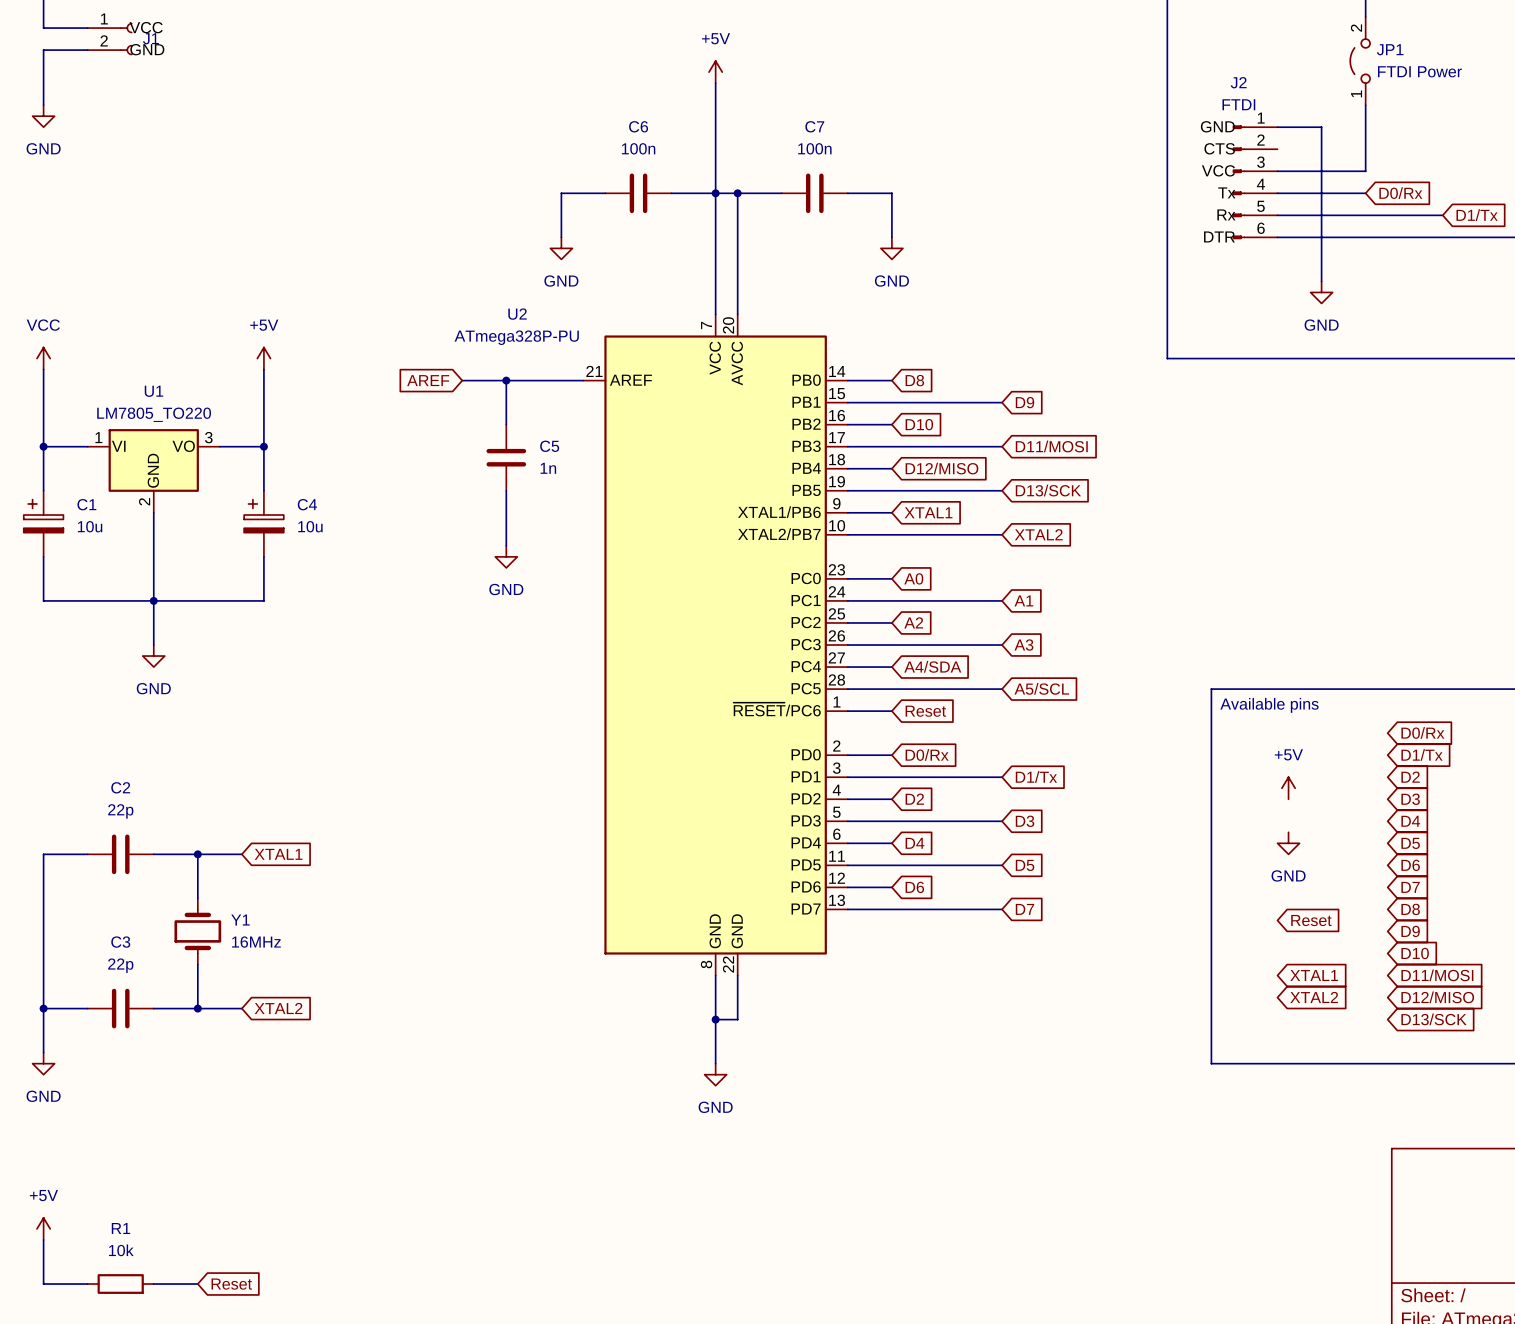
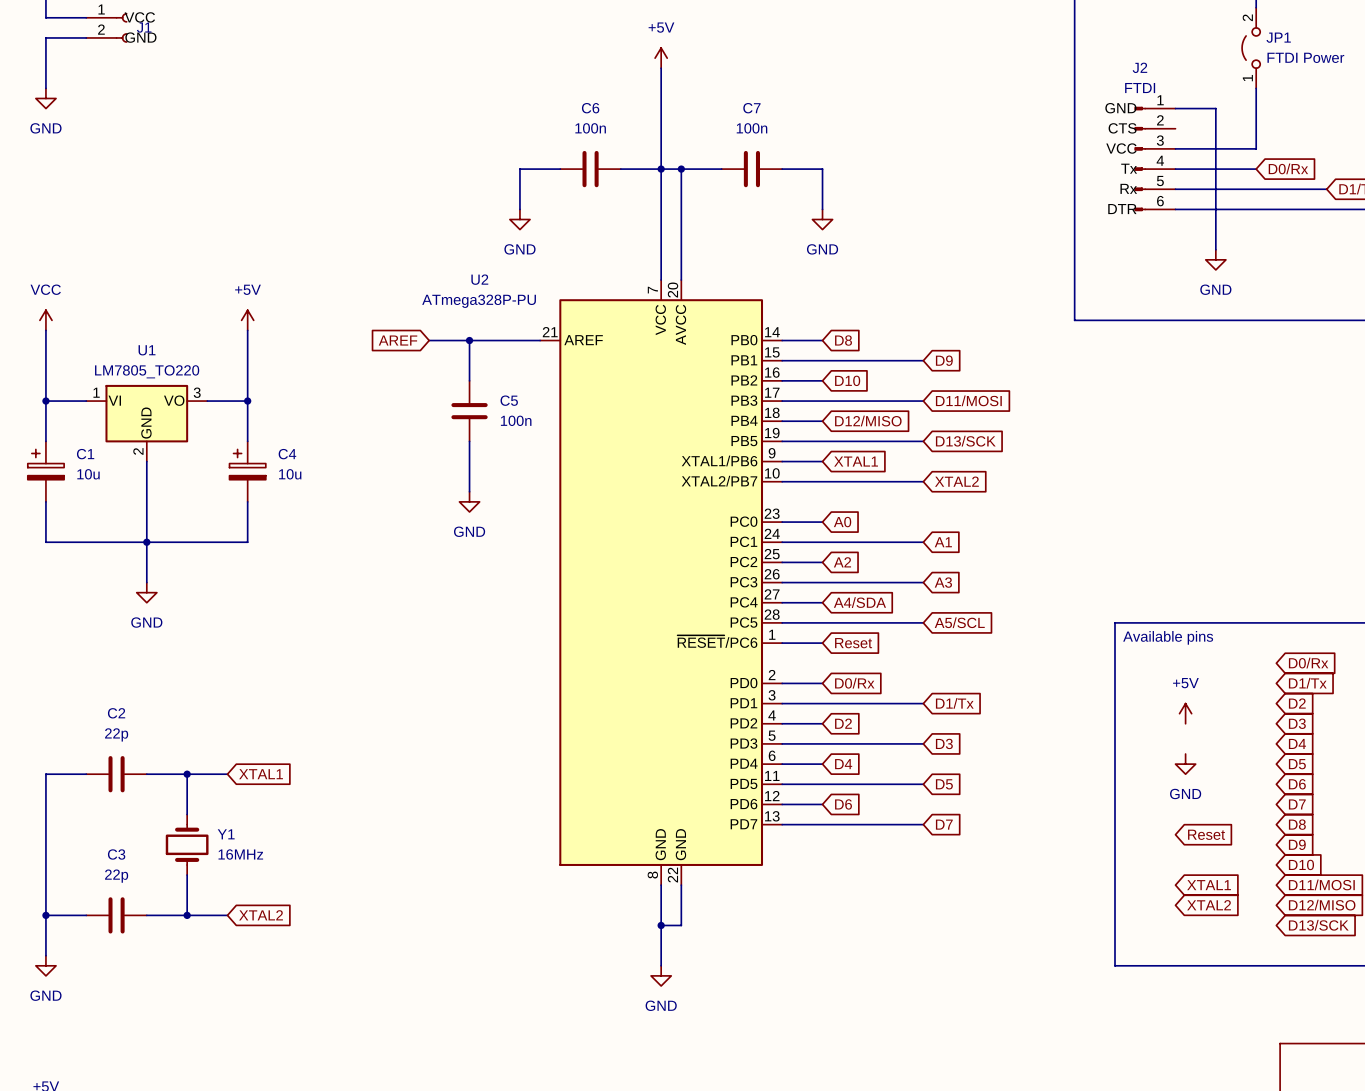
C5 value: 1n (548, 468) -> 100n (516, 420)

